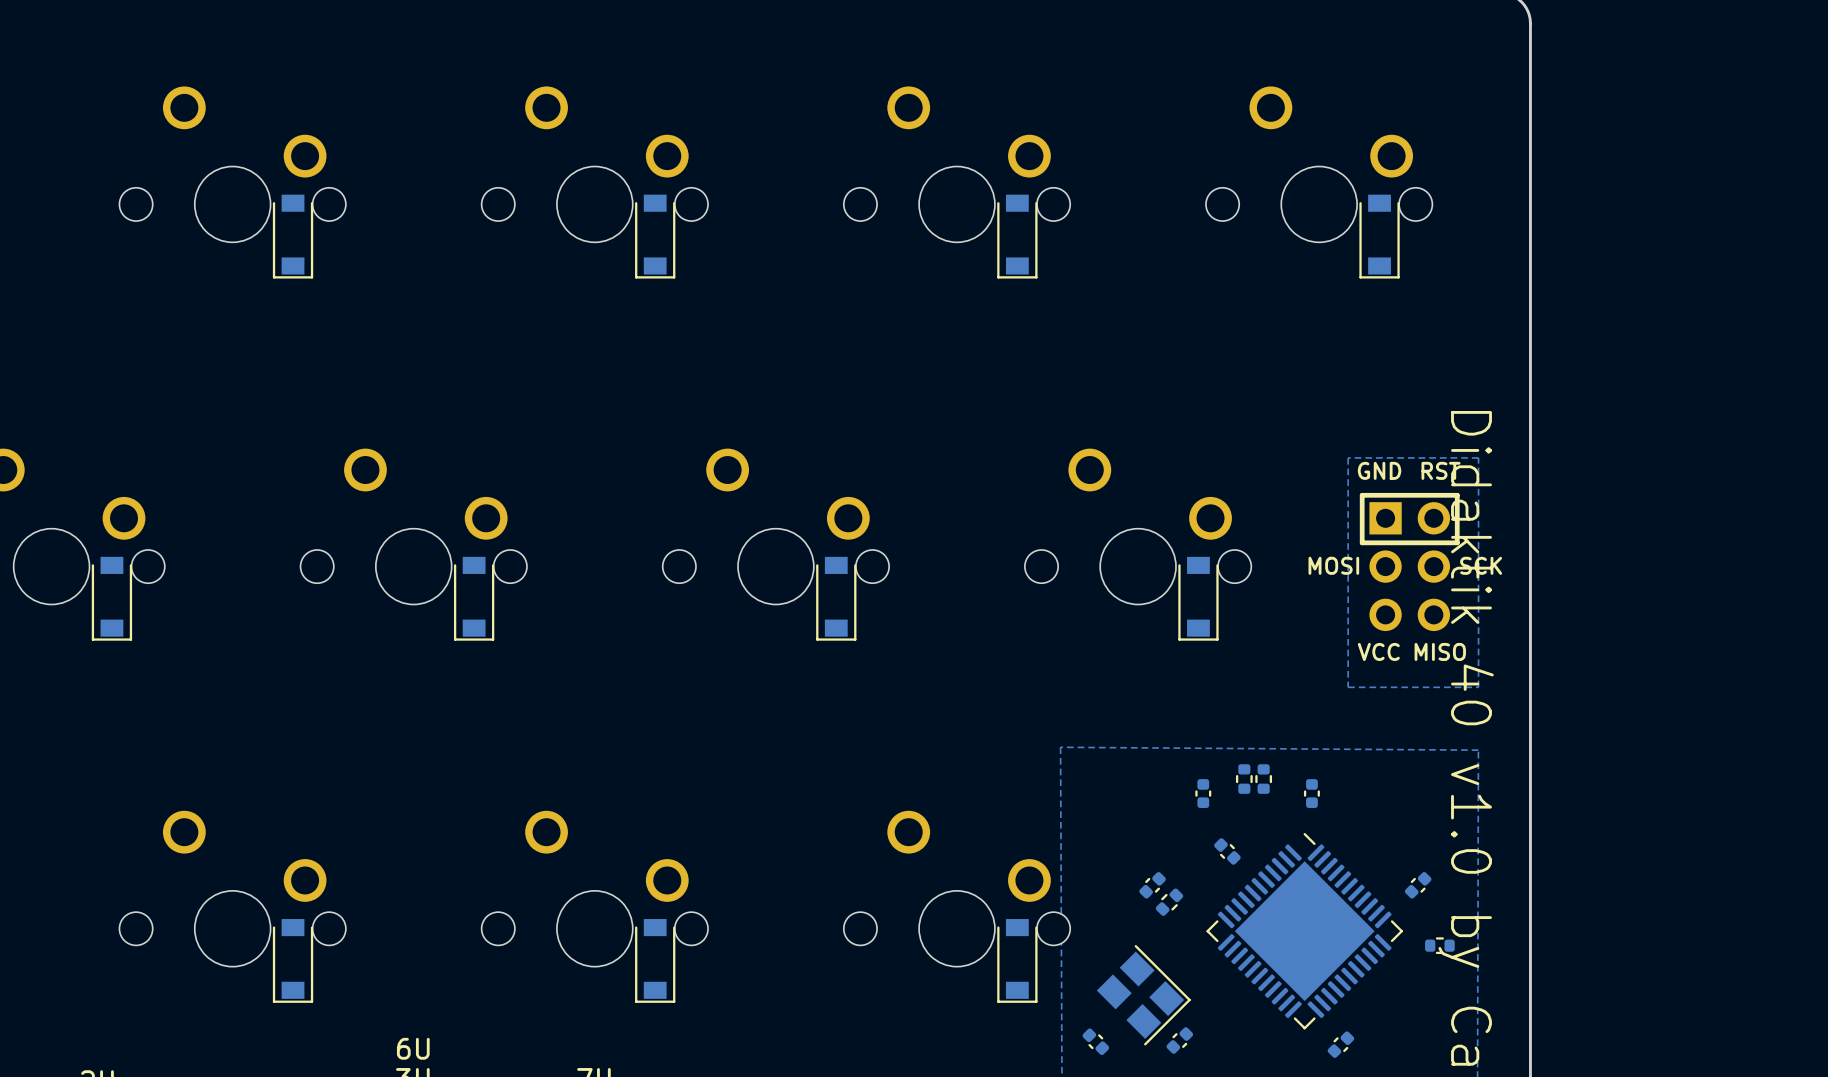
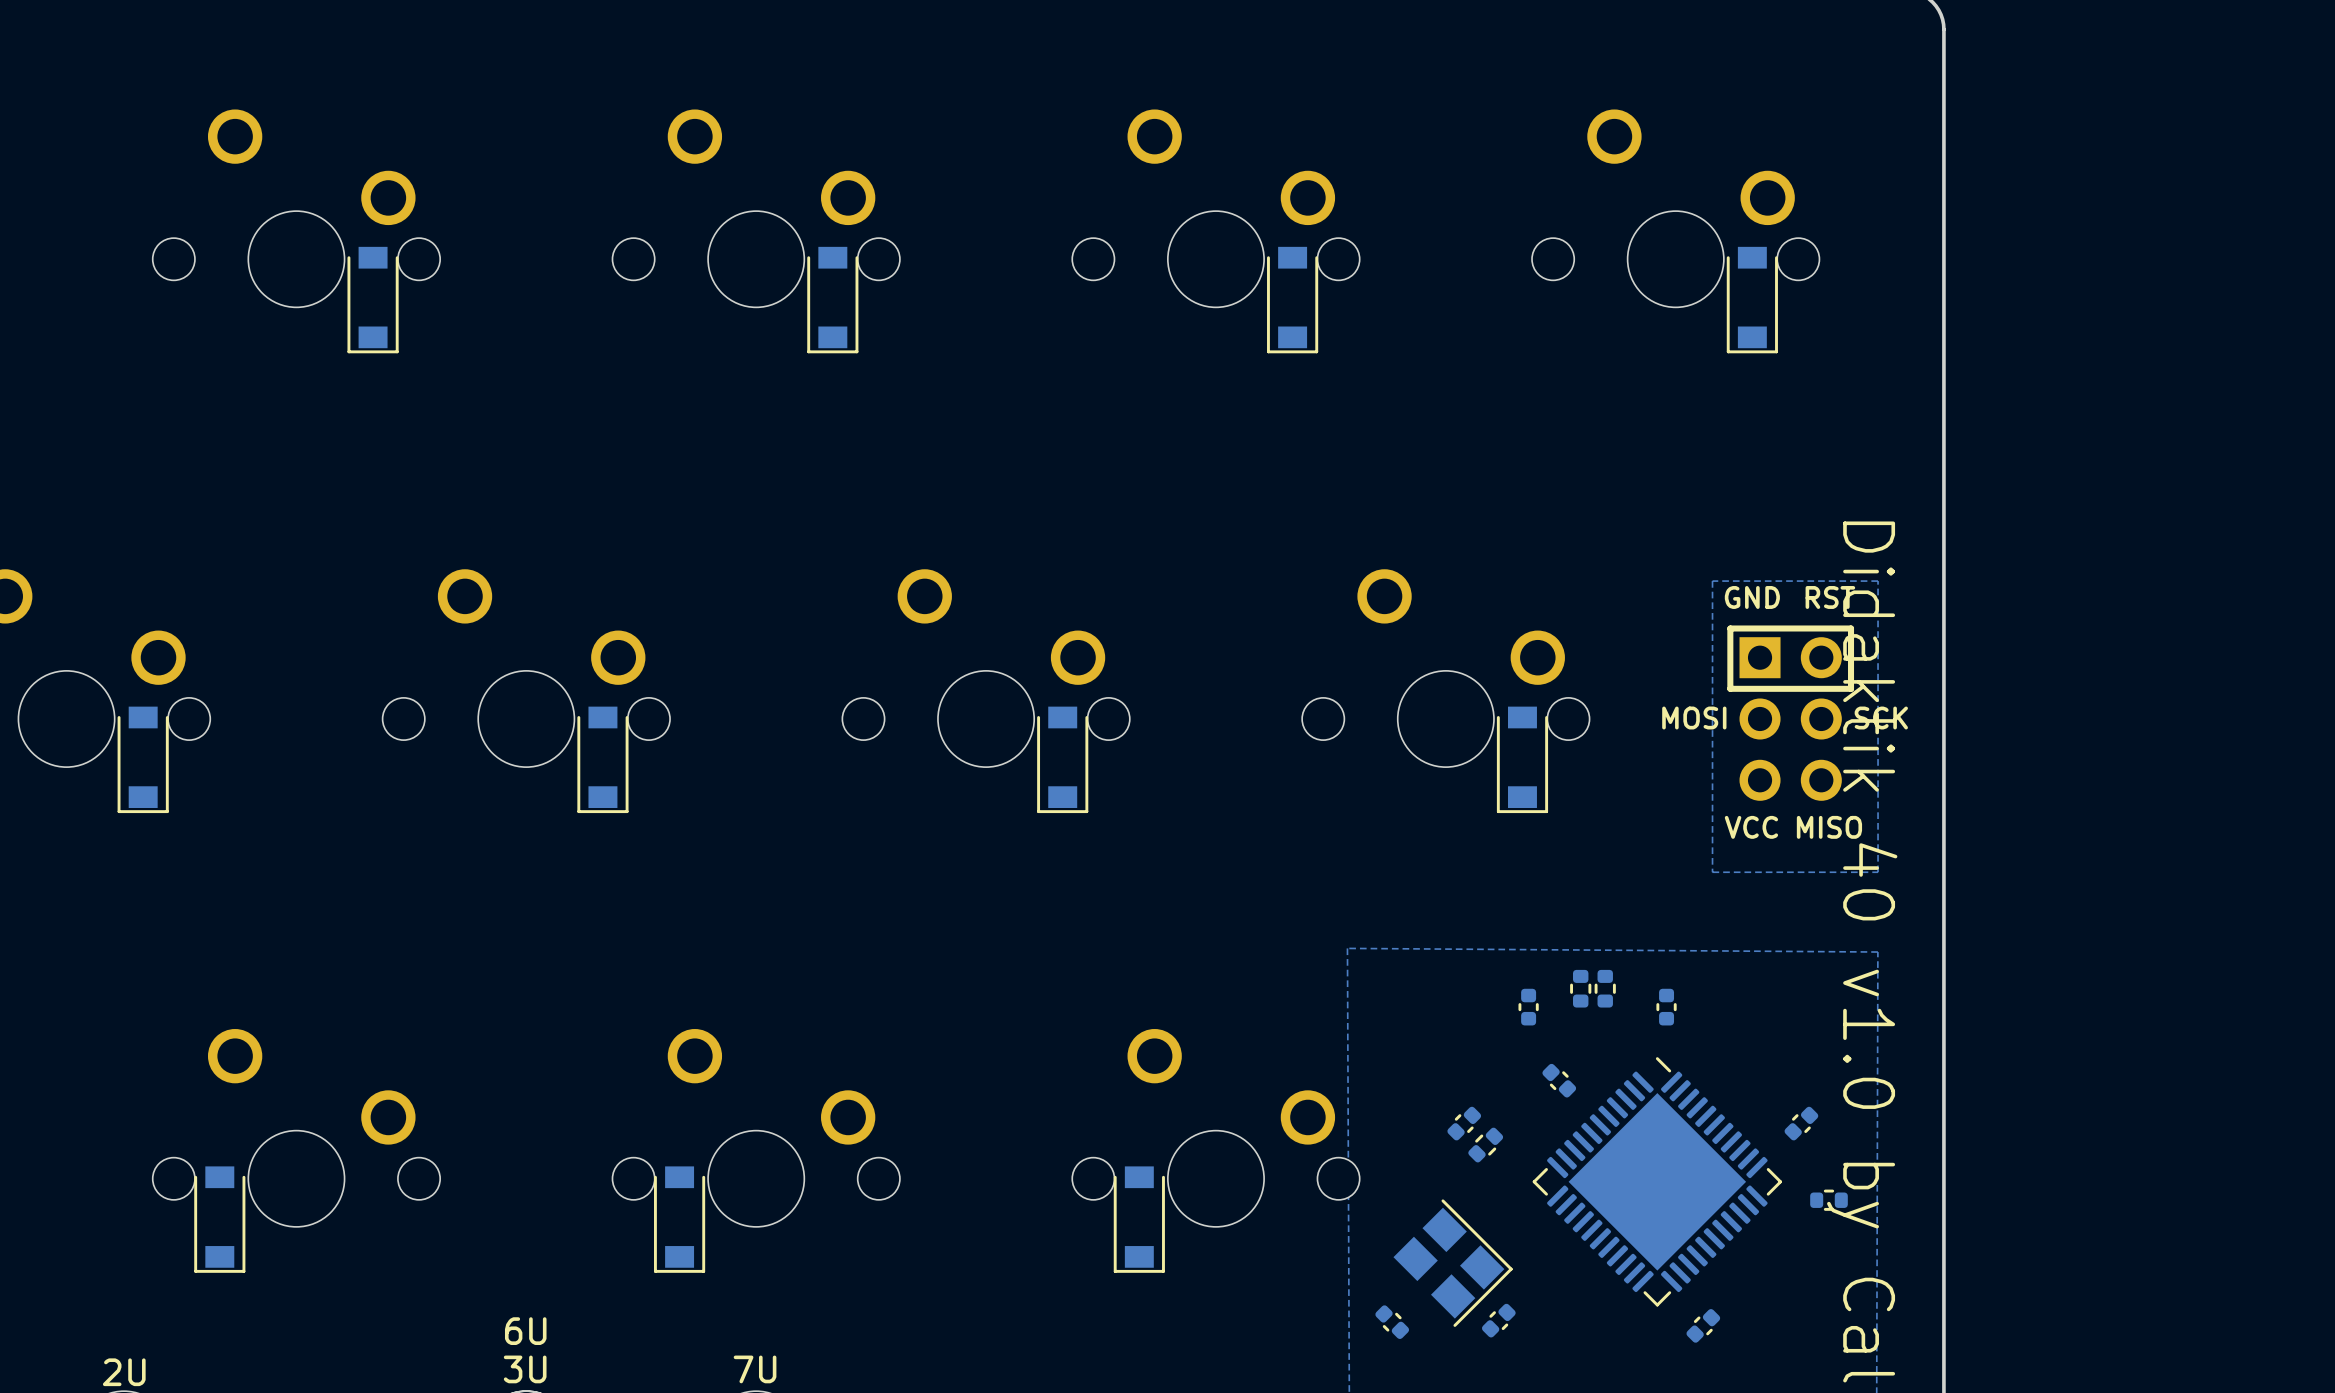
part: none -> (219, 1219)
part: (293, 960) -> none
part: none -> (679, 1219)
part: (655, 960) -> none
part: none -> (1139, 1219)
part: (1017, 960) -> none

